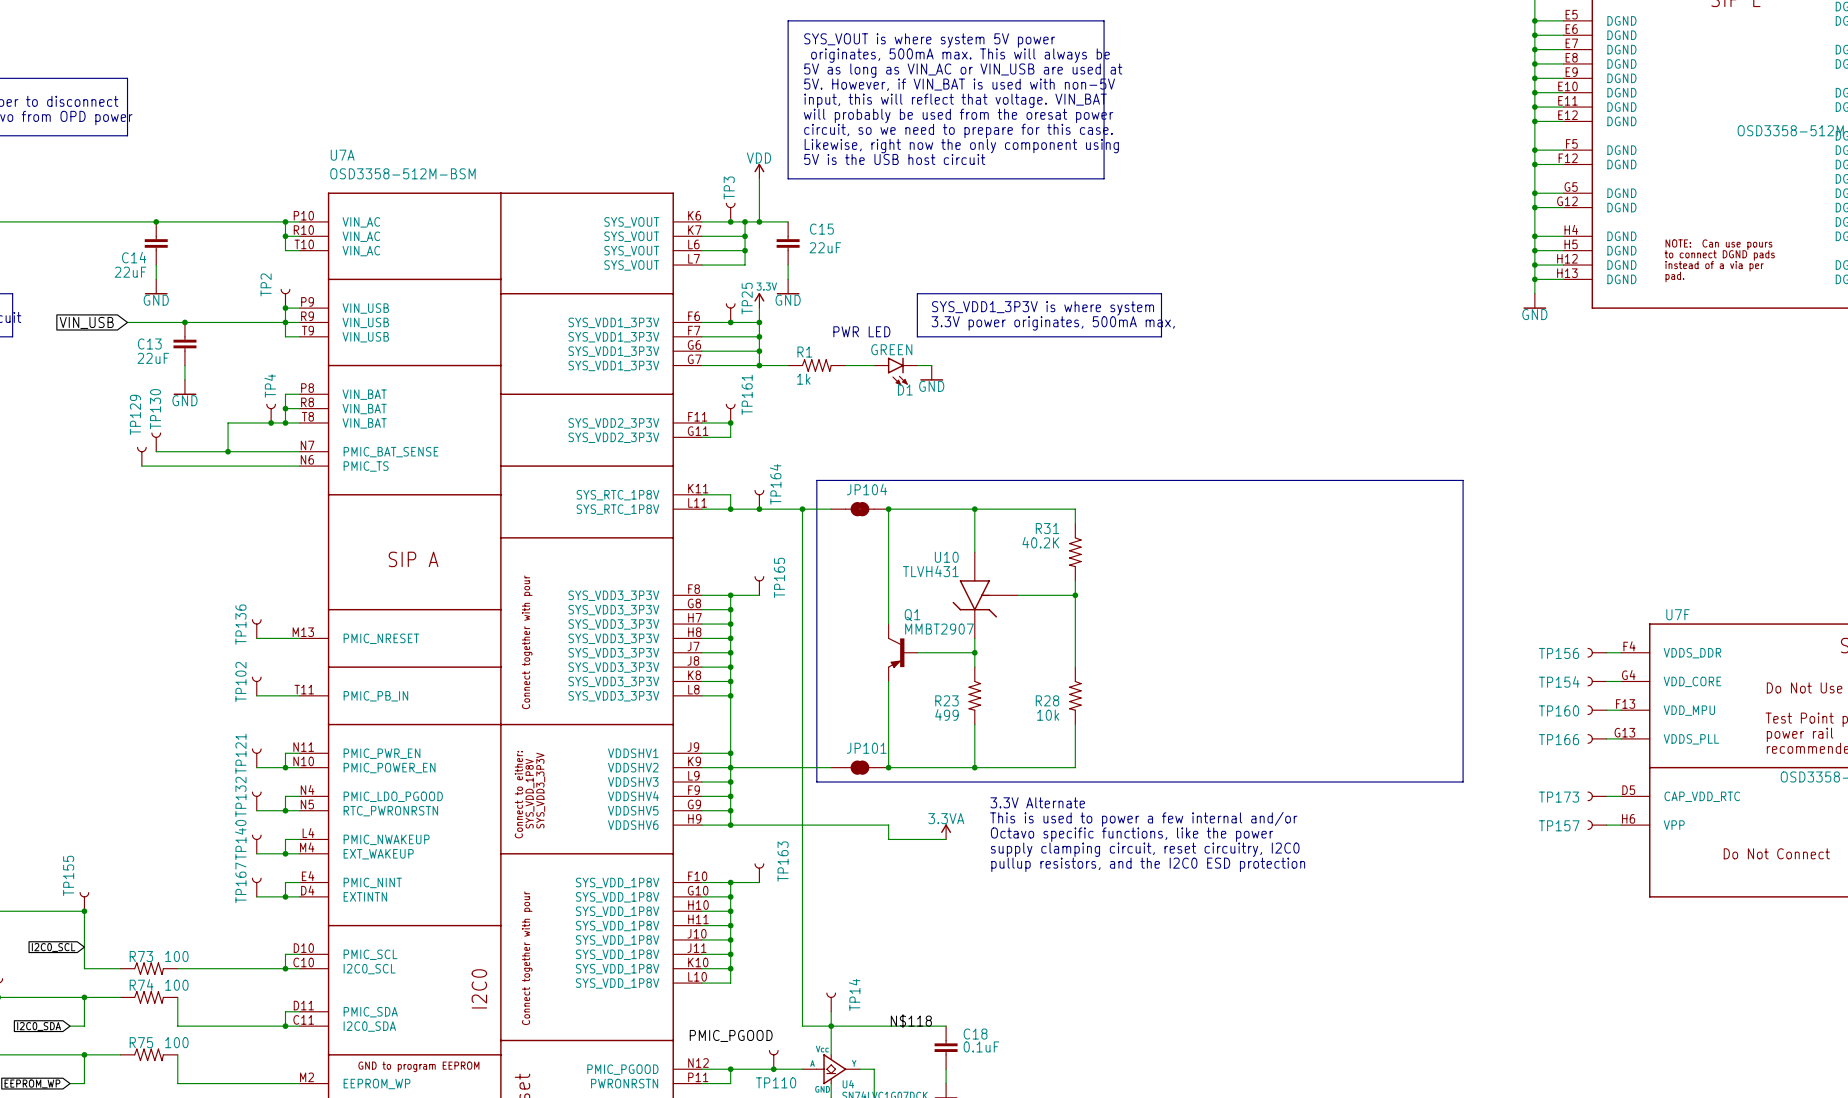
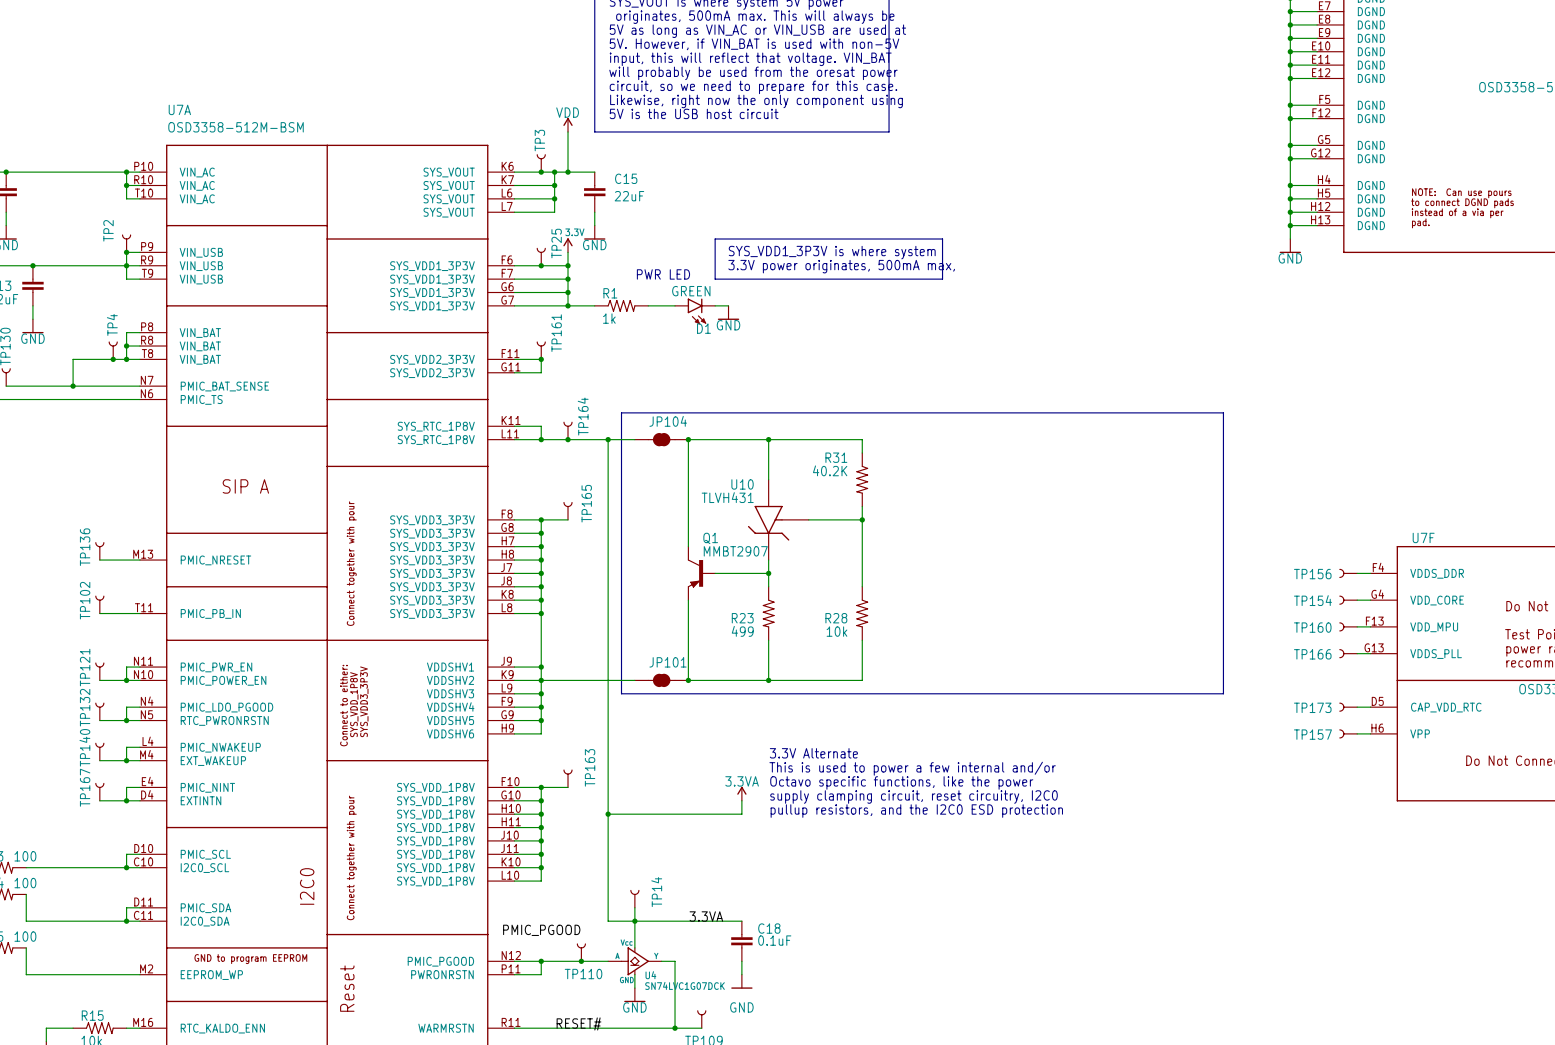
text position: 3.3V Alternate (1037, 802) -> 3.3V Alternate (813, 753)
text position: This is used to power a few internal and/or (1143, 819) -> This is used to power a few internal and/or (912, 768)
wire: (730, 825) (888, 825) (888, 839) (946, 839) -> none
junction: (730, 825) -> none
power symbol position: 3.3VA (946, 831) -> 3.3VA (741, 793)
text position: Octavo specific functions, like the power (1132, 834) -> Octavo specific functions, like the power (901, 782)
text position: supply clamping circuit, reset circuitry, I2C0 (1145, 849) -> supply clamping circuit, reset circuitry, I2C0 (914, 797)
text position: pullup resistors, and the I2C0 ESD protection (1148, 864) -> pullup resistors, and the I2C0 ESD protection (916, 811)
wire: none -> (741, 800) (741, 814) (608, 814)
junction: none -> (608, 814)
label: N$118 (911, 1021) -> 3.3VA (706, 916)

